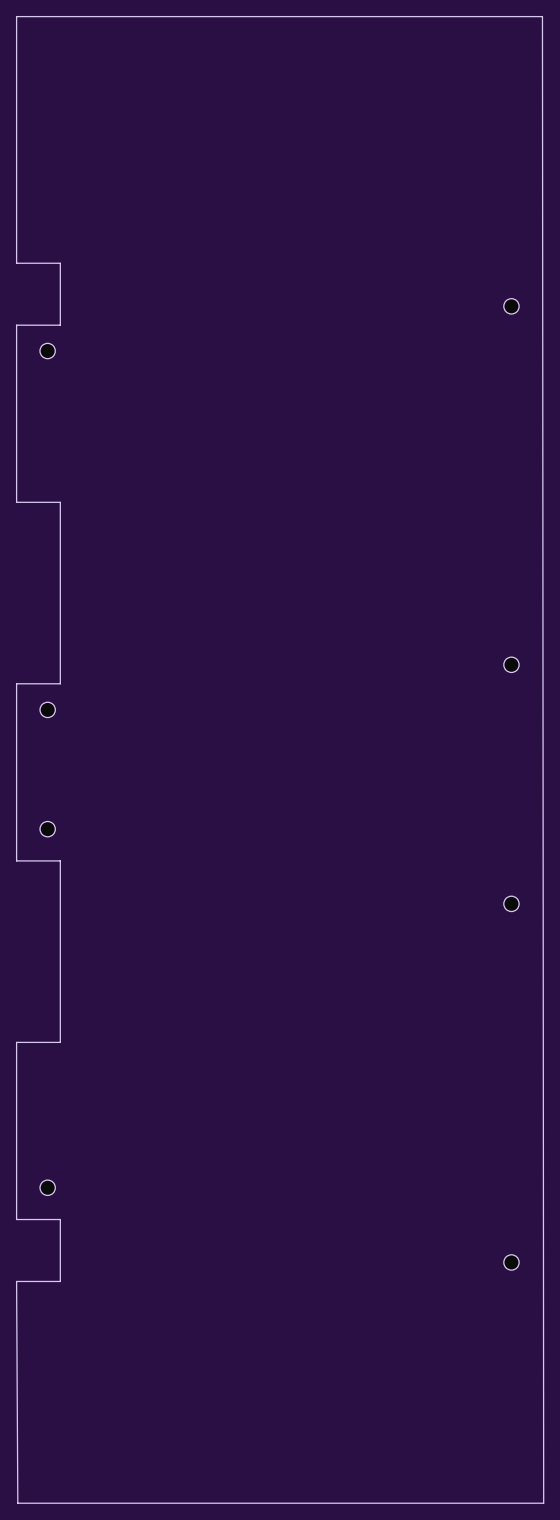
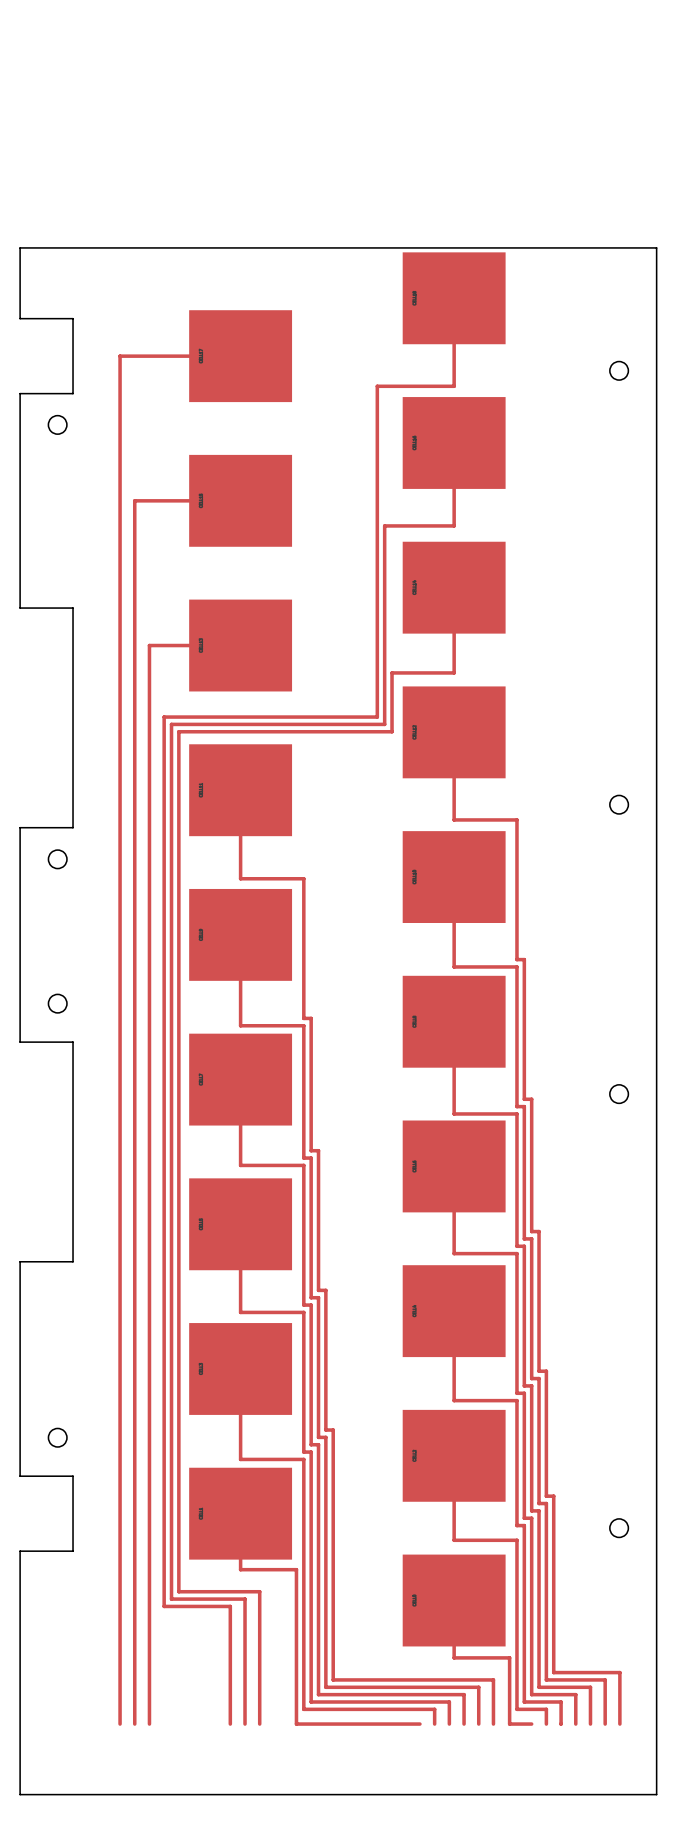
board edge: (16, 204) (16, 16) (542, 16) (543, 1503) (17, 1503) (16, 1281) -> (20, 247) (656, 247) (656, 1794) (20, 1794) (20, 1551)
track: none -> (454, 298) (454, 386) (377, 386) (377, 717) (164, 717) (164, 1606) (230, 1606) (230, 1724)
part: none -> (454, 298)
track: none -> (240, 356) (120, 356) (120, 1724)
part: none -> (240, 356)
track: none -> (454, 442) (454, 525) (384, 525) (384, 724) (171, 724) (171, 1599) (245, 1599) (245, 1724)
part: none -> (454, 442)
track: none -> (240, 500) (134, 500) (134, 1724)
part: none -> (240, 500)
track: none -> (454, 587) (454, 672) (392, 672) (392, 731) (178, 731) (178, 1591) (259, 1591) (259, 1724)
part: none -> (454, 587)
track: none -> (240, 645) (149, 645) (149, 1724)
part: none -> (240, 645)
track: none -> (454, 732) (454, 819) (516, 819) (516, 959) (524, 959) (524, 1099) (531, 1099) (531, 1231) (539, 1231) (539, 1371) (546, 1371) (546, 1496) (553, 1496) (553, 1672) (619, 1672) (619, 1724)
part: none -> (454, 732)
track: none -> (240, 790) (240, 878) (303, 878) (303, 1018) (311, 1018) (311, 1150) (318, 1150) (318, 1290) (325, 1290) (325, 1430) (333, 1430) (333, 1679) (493, 1679) (493, 1724)
part: none -> (240, 790)
track: none -> (454, 877) (454, 966) (516, 966) (516, 1106) (524, 1106) (524, 1238) (531, 1238) (531, 1378) (539, 1378) (539, 1503) (546, 1503) (546, 1679) (605, 1679) (605, 1724)
part: none -> (454, 877)
track: none -> (240, 934) (240, 1025) (303, 1025) (303, 1158) (311, 1158) (311, 1297) (318, 1297) (318, 1437) (325, 1437) (325, 1687) (478, 1687) (478, 1724)
part: none -> (240, 934)
track: none -> (454, 1021) (454, 1113) (516, 1113) (516, 1246) (524, 1246) (524, 1385) (531, 1385) (531, 1510) (539, 1510) (539, 1687) (590, 1687) (590, 1724)
part: none -> (454, 1021)
track: none -> (240, 1079) (240, 1165) (303, 1165) (303, 1305) (311, 1305) (311, 1444) (318, 1444) (318, 1694) (464, 1694) (464, 1724)
part: none -> (240, 1079)
track: none -> (454, 1166) (454, 1253) (516, 1253) (516, 1393) (524, 1393) (524, 1518) (531, 1518) (531, 1694) (575, 1694) (575, 1724)
part: none -> (454, 1166)
track: none -> (240, 1224) (240, 1312) (303, 1312) (303, 1452) (311, 1452) (311, 1702) (449, 1702) (449, 1724)
part: none -> (240, 1224)
track: none -> (454, 1311) (454, 1400) (516, 1400) (516, 1525) (524, 1525) (524, 1702) (561, 1702) (560, 1724)
part: none -> (454, 1311)
track: none -> (240, 1368) (240, 1459) (303, 1459) (303, 1709) (434, 1709) (434, 1724)
part: none -> (240, 1368)
track: none -> (454, 1455) (454, 1540) (516, 1540) (516, 1709) (546, 1709) (546, 1724)
part: none -> (454, 1455)
track: none -> (240, 1513) (240, 1569) (296, 1569) (296, 1724) (419, 1724)
part: none -> (240, 1513)
track: none -> (454, 1600) (454, 1657) (509, 1657) (509, 1724) (531, 1724)
part: none -> (454, 1600)

